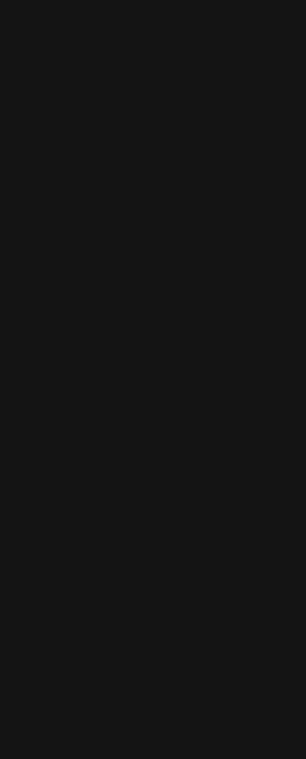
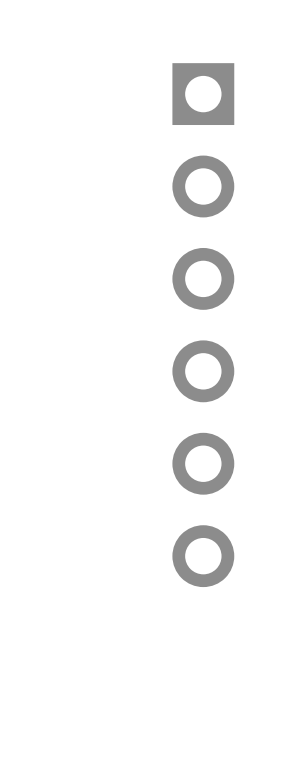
part: none -> (203, 325)

